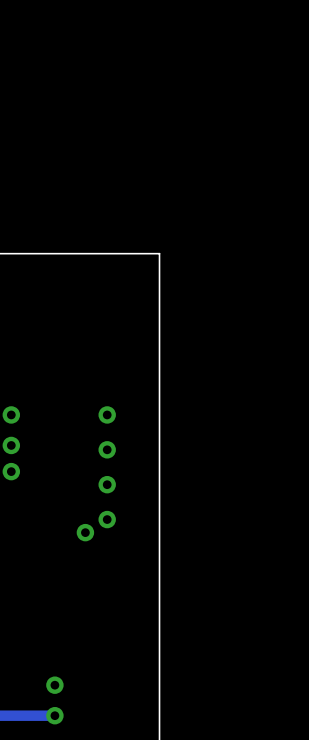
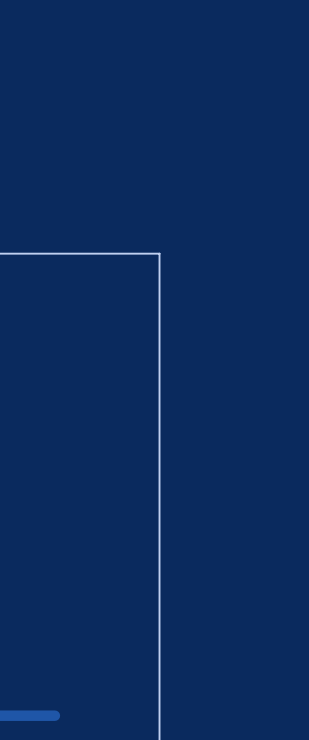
via: (11, 414) -> none
via: (107, 414) -> none
via: (11, 445) -> none
via: (107, 449) -> none
via: (11, 471) -> none
via: (107, 484) -> none
via: (107, 519) -> none
via: (85, 532) -> none
via: (54, 685) -> none
via: (54, 715) -> none

